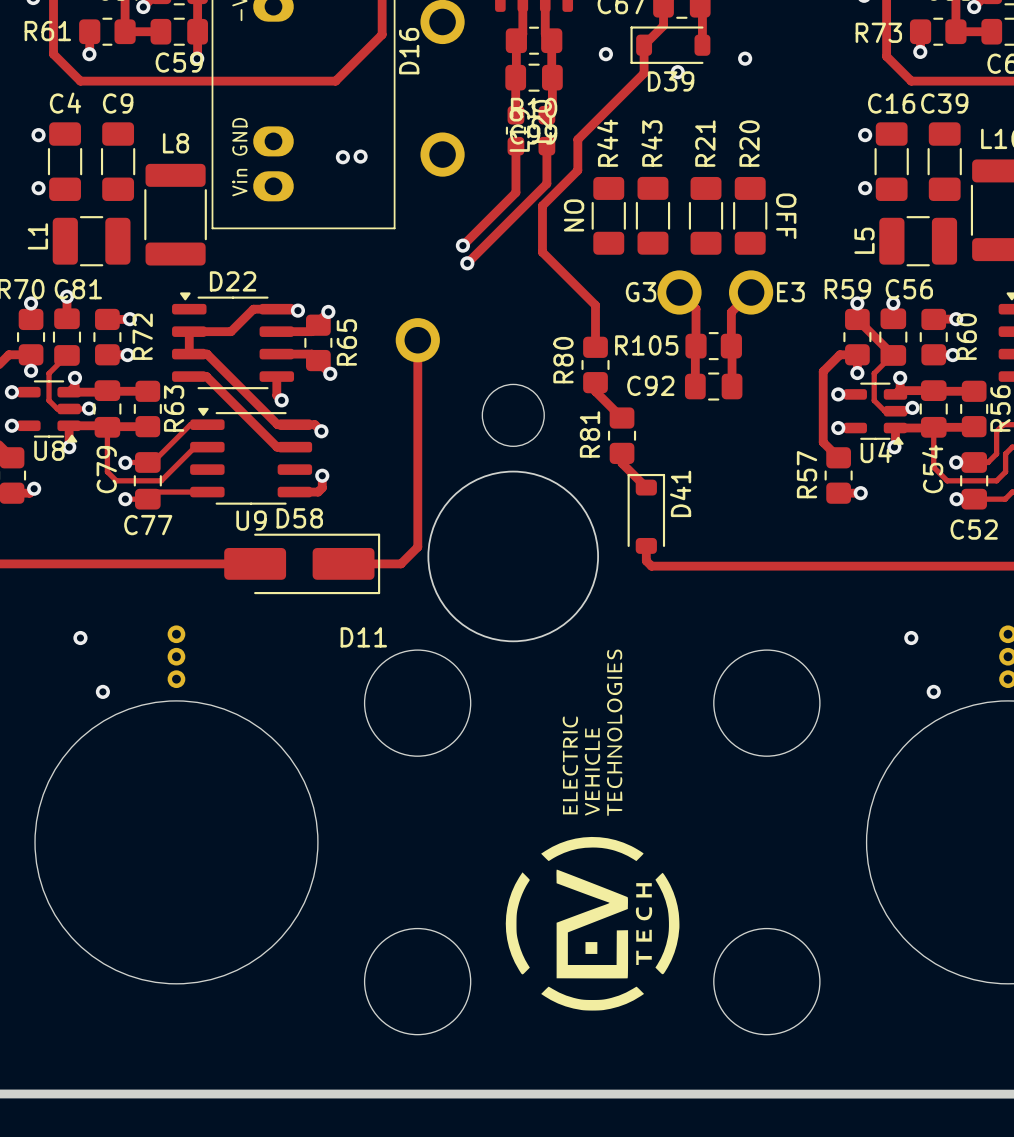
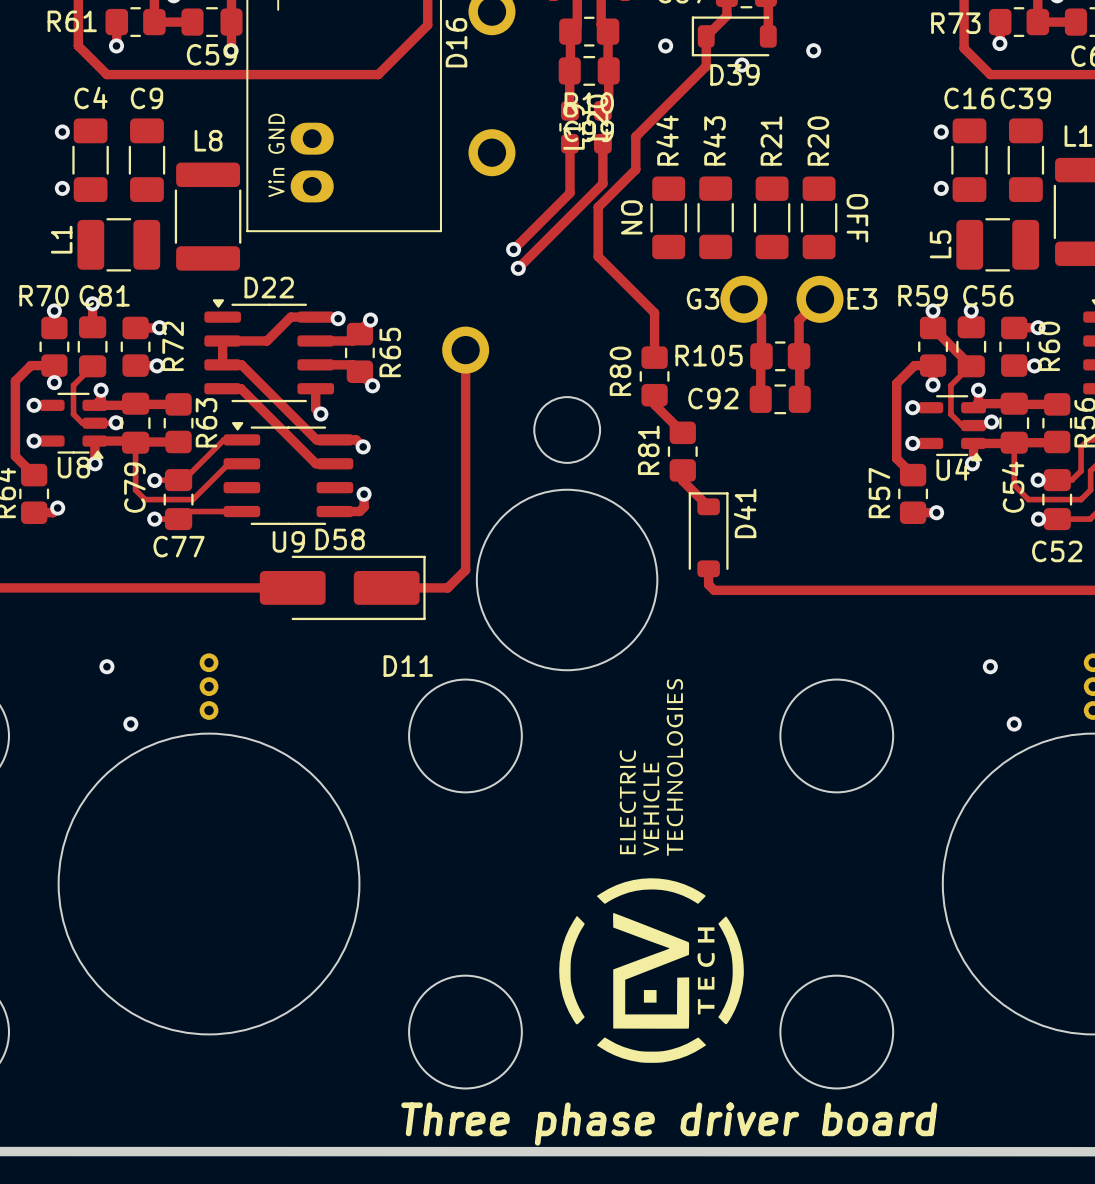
via: (360, 156) -> none
via: (342, 157) -> none
text: none -> Three phase driver board (669, 1124)

